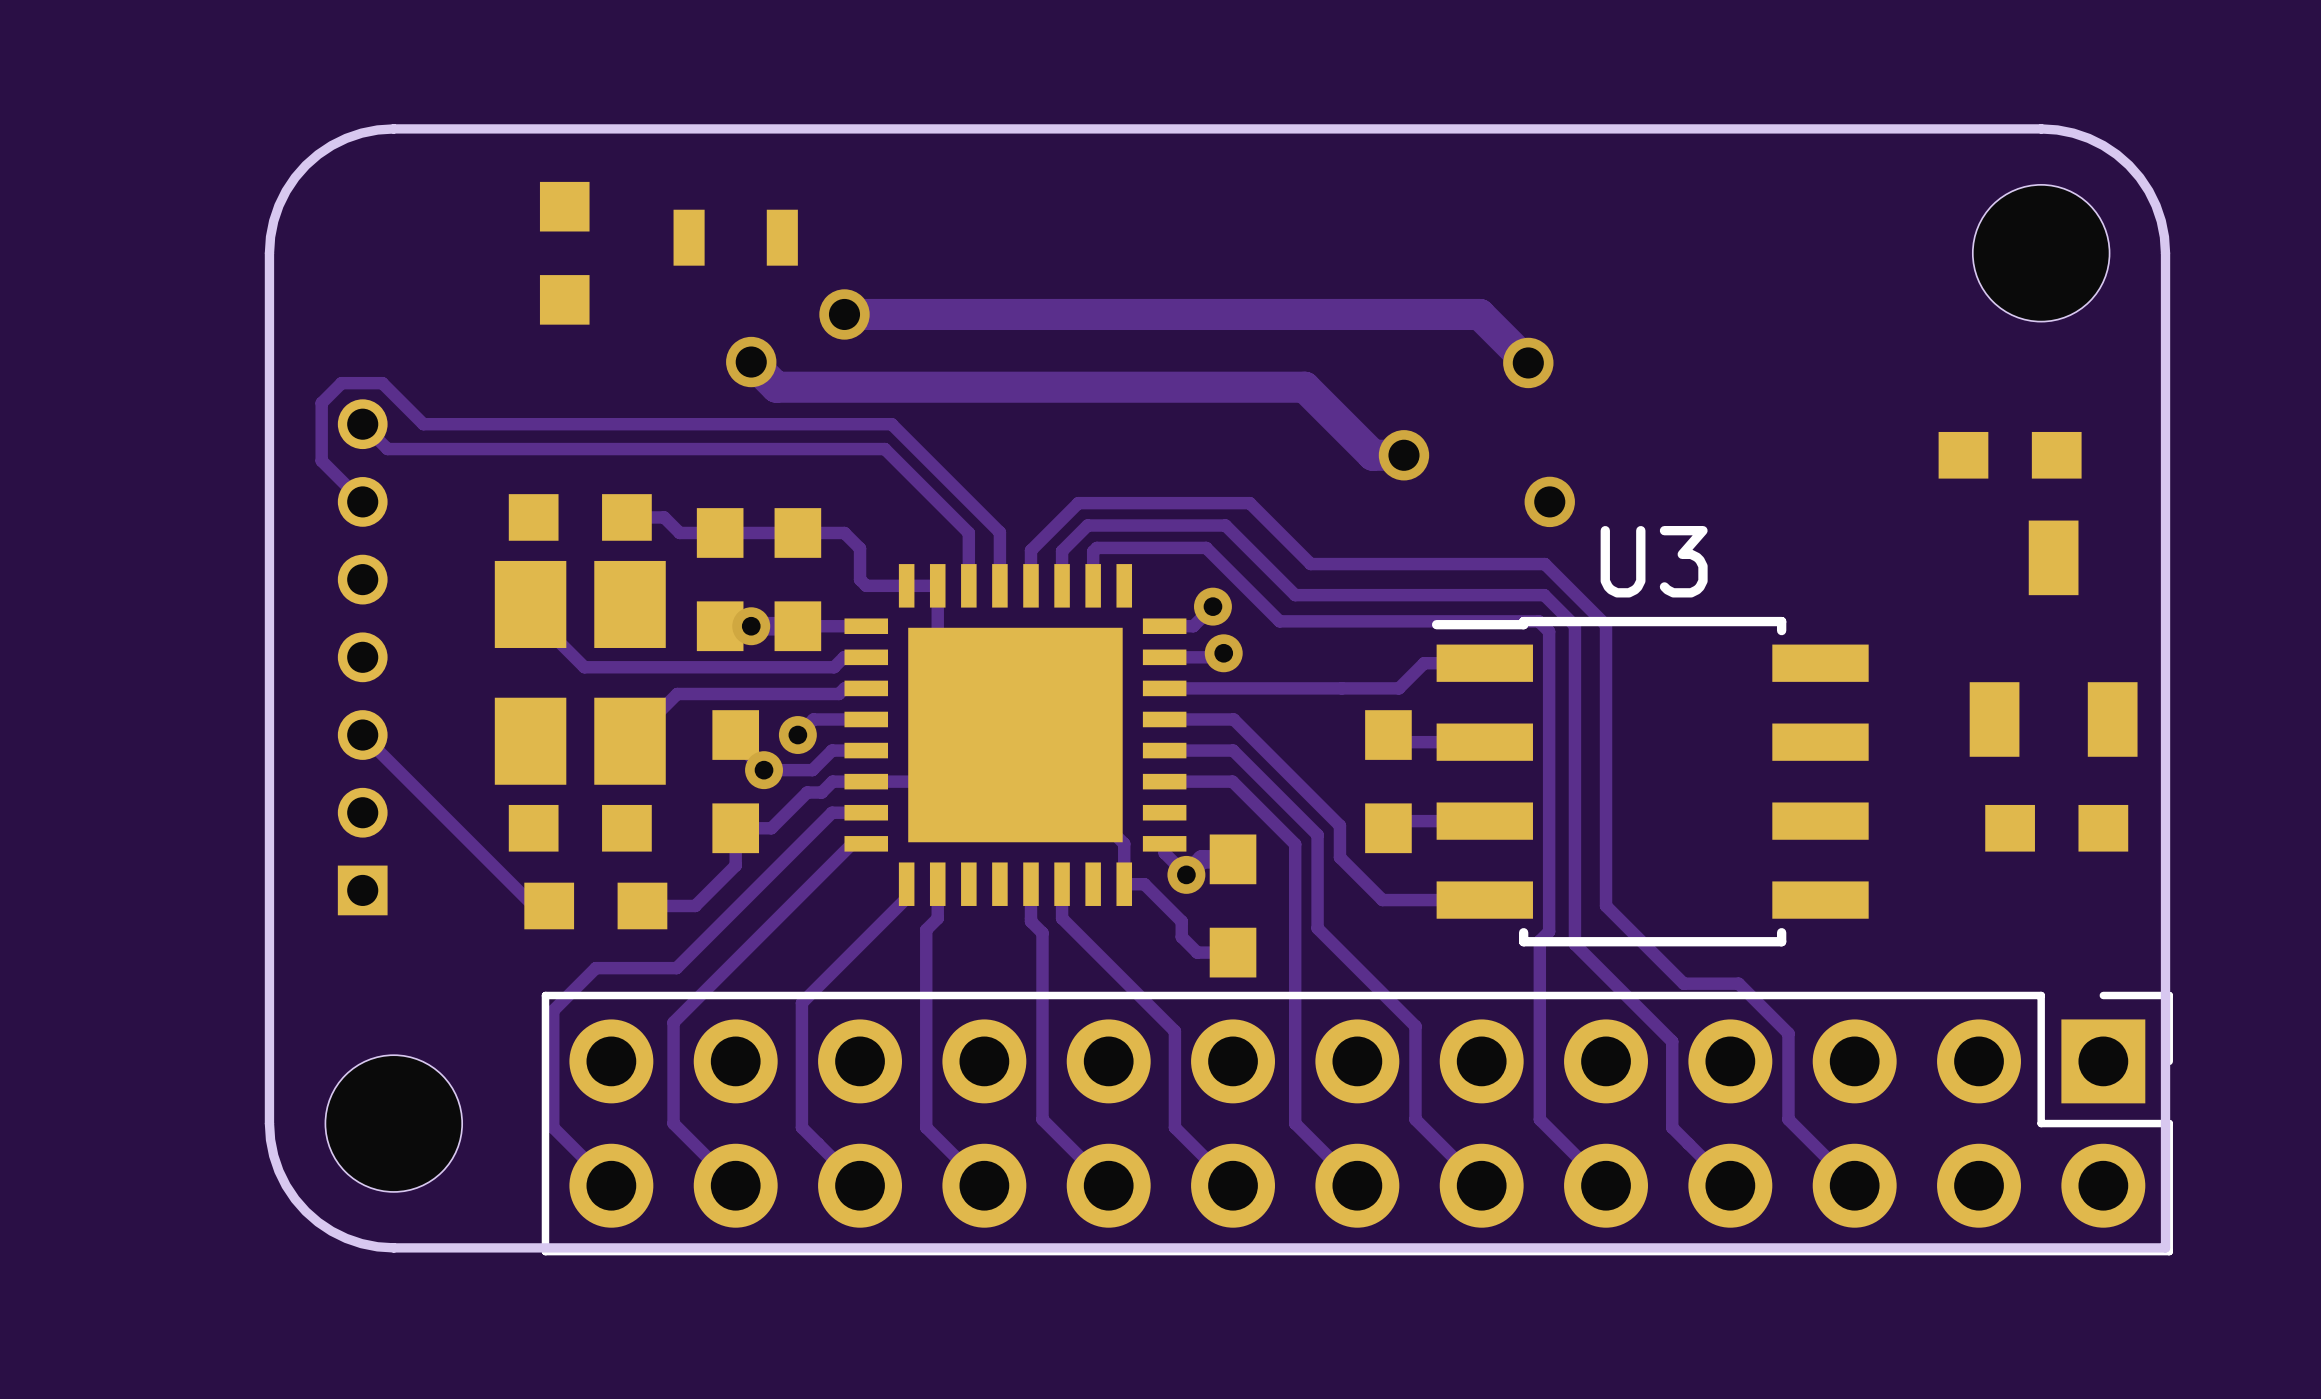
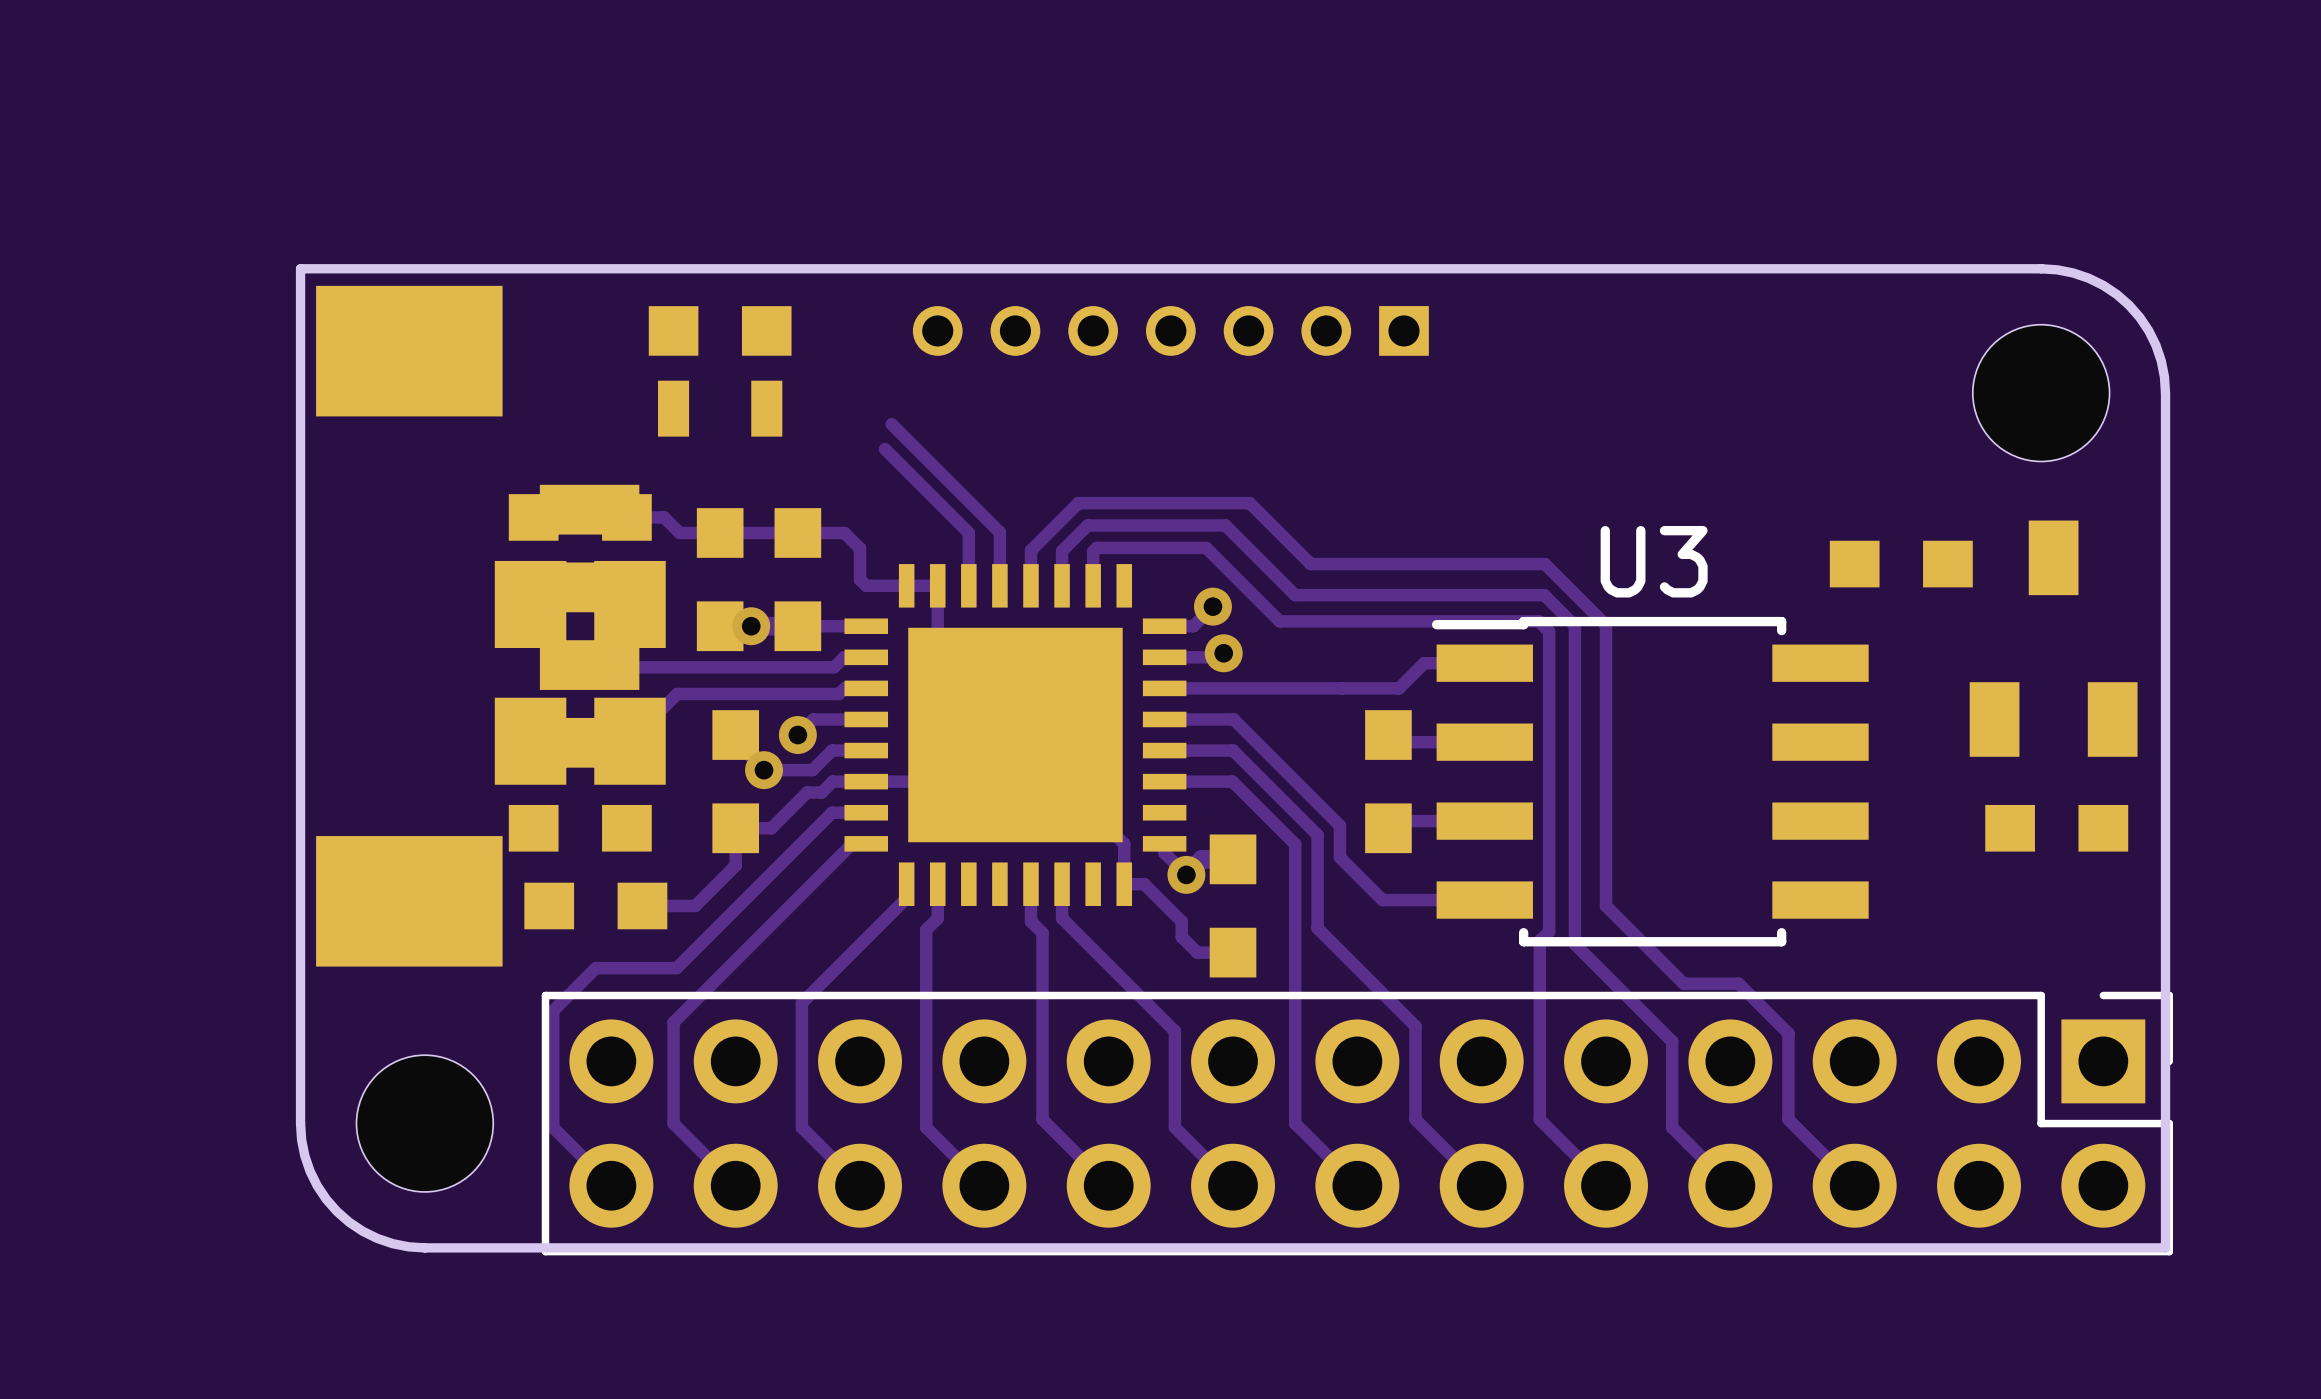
part position: (735, 237) -> (720, 408)
part rotation: 0° (564, 253) -> 90° clockwise (720, 330)
part position: (564, 253) -> (720, 330)
part position: (2041, 253) -> (2041, 393)
track: (844, 314) (1479, 314) (1528, 362) -> none
via: (844, 314) -> none
track: (751, 362) (776, 387) (1304, 387) (1372, 455) (1403, 455) -> none
via: (751, 362) -> none
via: (1528, 362) -> none
board edge: (2165, 393) (2165, 253) (2161, 221) (2156, 205) (2139, 177) (2116, 154) (2088, 138) (2057, 129) (393, 128) (361, 133) (346, 138) (318, 154) (295, 177) (278, 205) (270, 237) (270, 1139) (278, 1171) (286, 1185) (295, 1199) (318, 1222) (331, 1231) (361, 1243) (377, 1246) (424, 1247) -> (2165, 393) (2161, 360) (2156, 345) (2139, 317) (2116, 294) (2103, 285) (2088, 278) (2057, 269) (300, 268) (301, 1139) (310, 1171) (317, 1185) (326, 1199) (349, 1222) (377, 1238) (392, 1243) (424, 1247)
track: (362, 424) (387, 449) (884, 449) -> none
track: (891, 424) (423, 424) (382, 383) (341, 383) (321, 403) (321, 460) (362, 501) -> none
via: (1403, 455) -> none
part position: (2010, 455) -> (1901, 564)
via: (1549, 501) -> none
part: none -> (477, 626)
part rotation: 0° (362, 657) -> 90° counterclockwise (1170, 330)
part position: (362, 657) -> (1170, 330)
track: (362, 735) (533, 905) (549, 905) -> none
part position: (393, 1123) -> (424, 1123)

